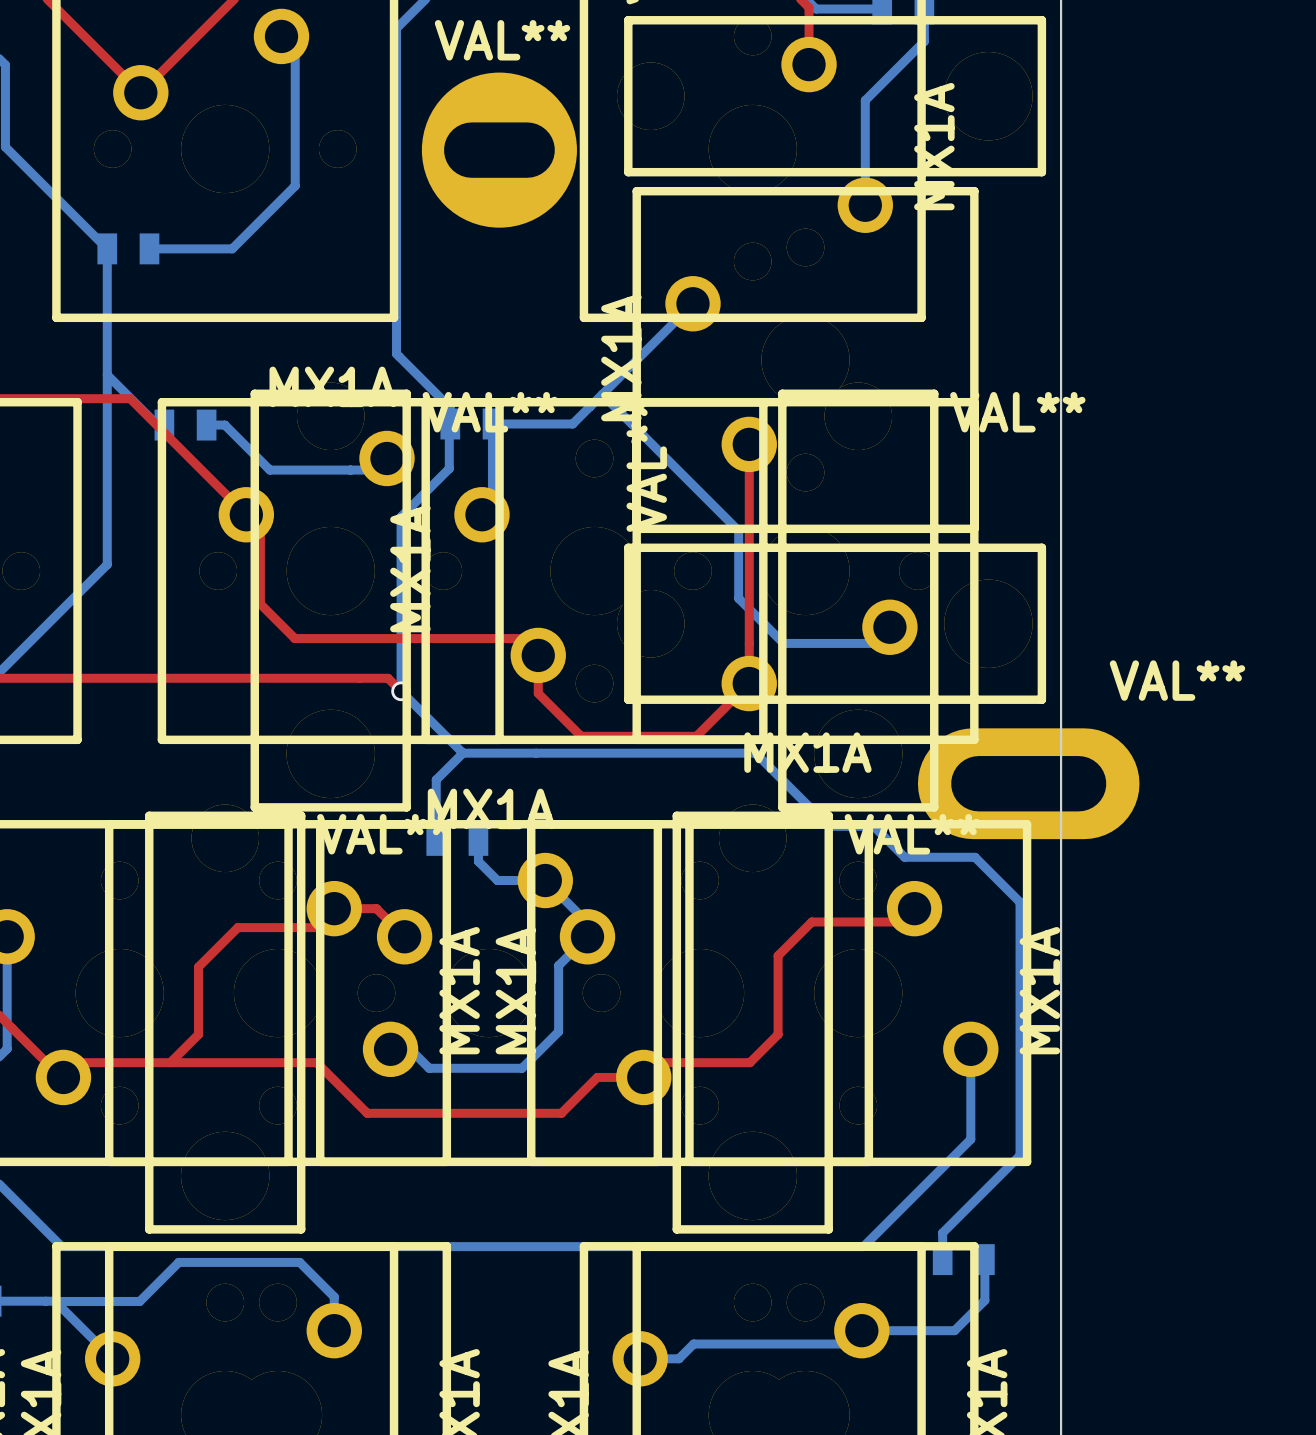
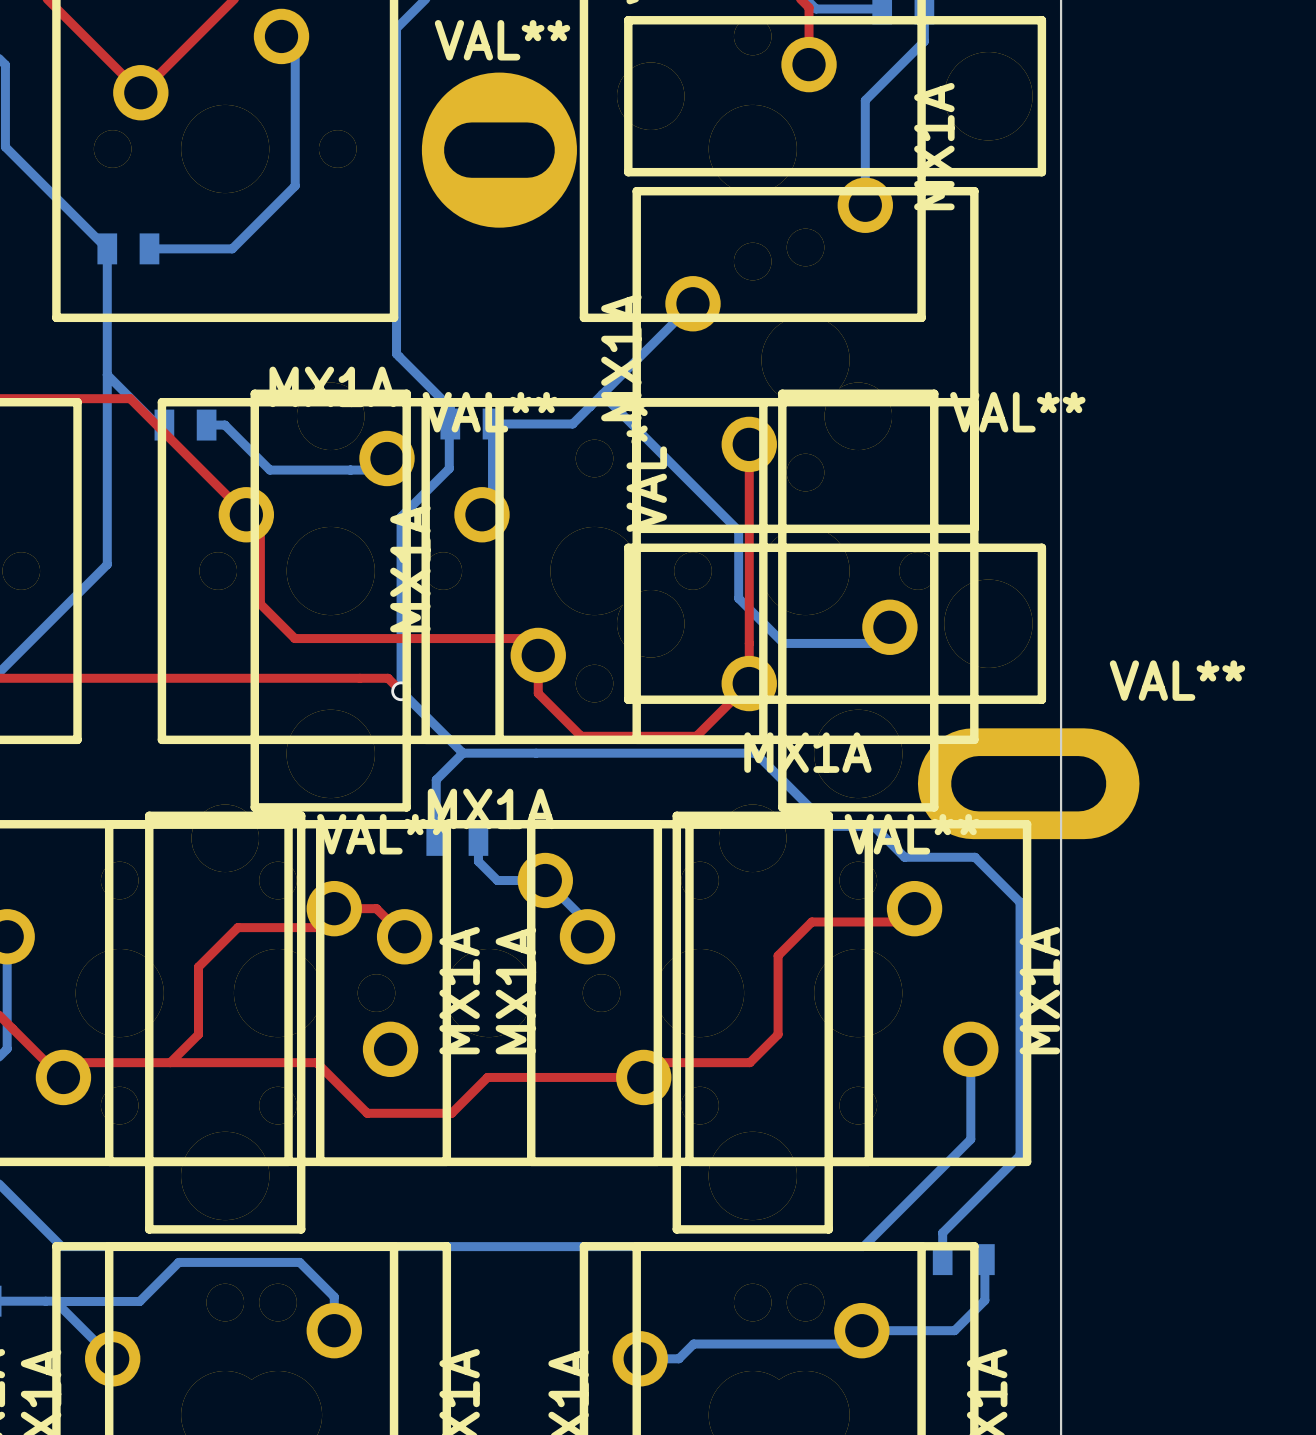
bottom track: (587, 936) (558, 965) (558, 1031) (522, 1068) (429, 1068) (410, 1049) (390, 1049) -> none
top track: (597, 1077) (561, 1113) (451, 1113) -> (597, 1077) (487, 1077) (451, 1113)

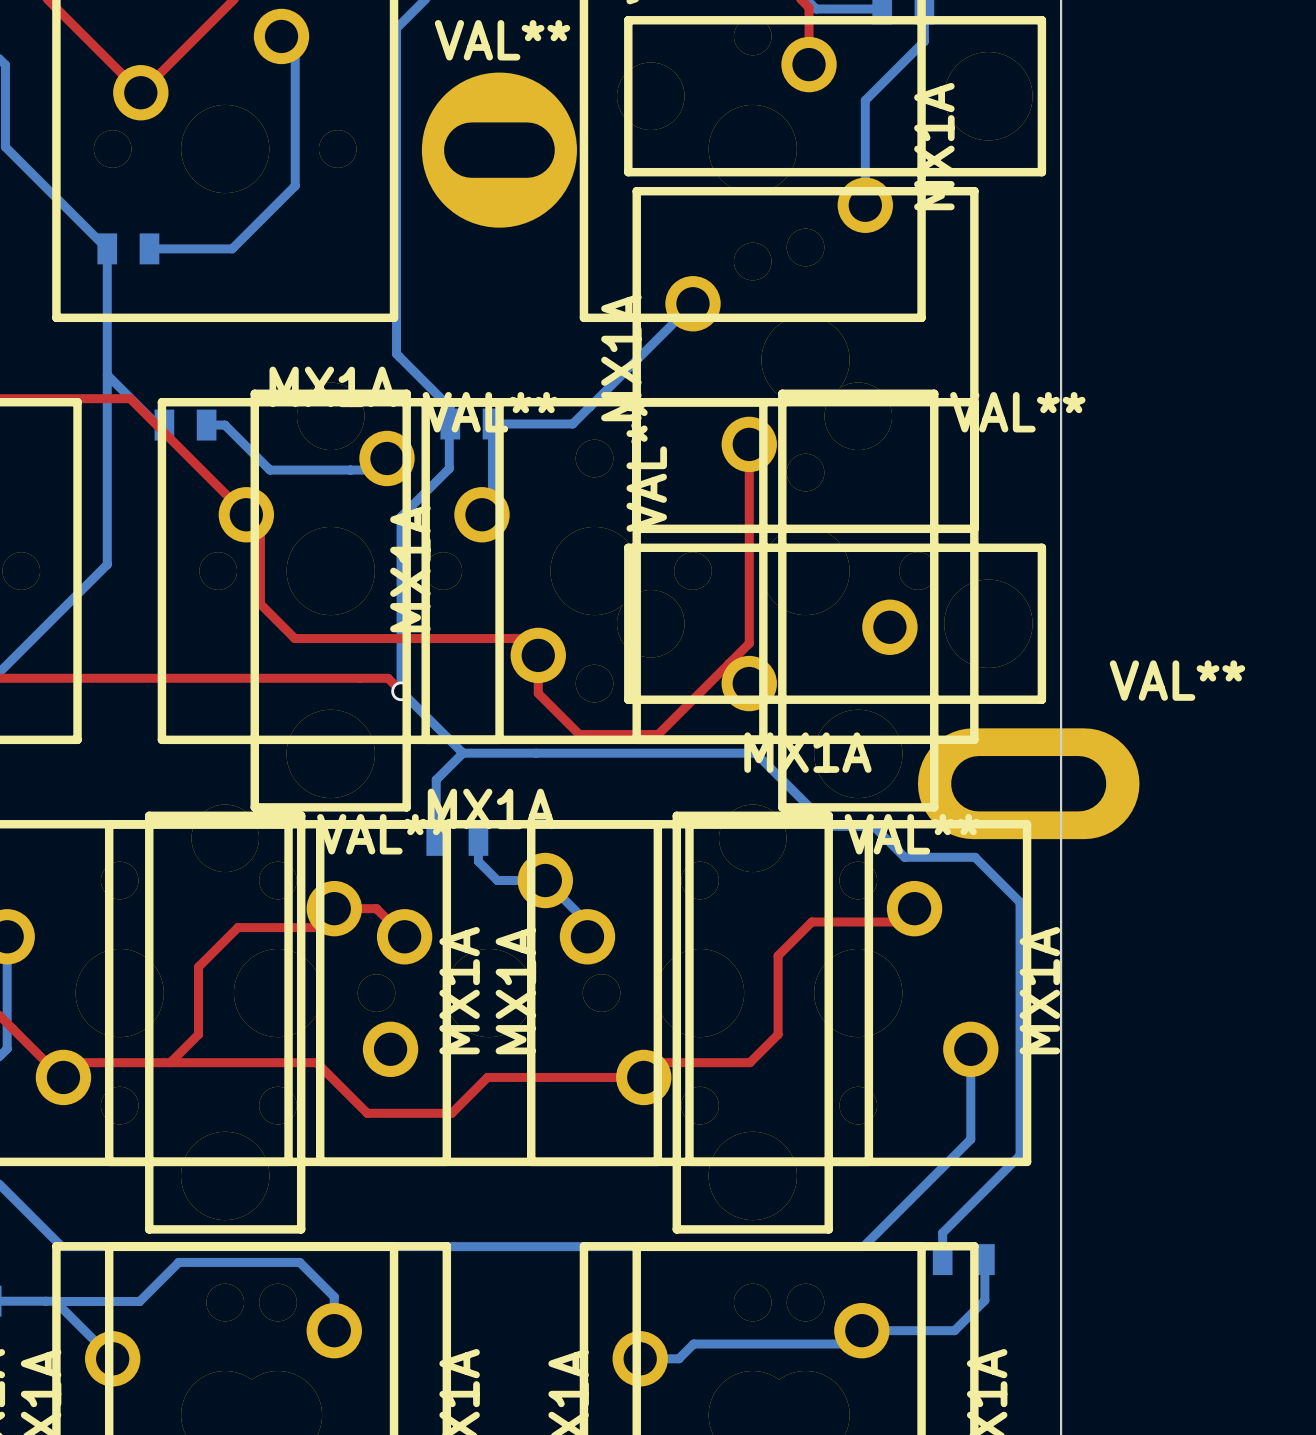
bottom track: (602, 394) (738, 530) (738, 598) (783, 643) (873, 643) (889, 627) -> none
top track: (749, 643) (749, 683) (696, 736) (581, 736) (579, 734) -> (749, 643) (658, 734) (579, 734)

